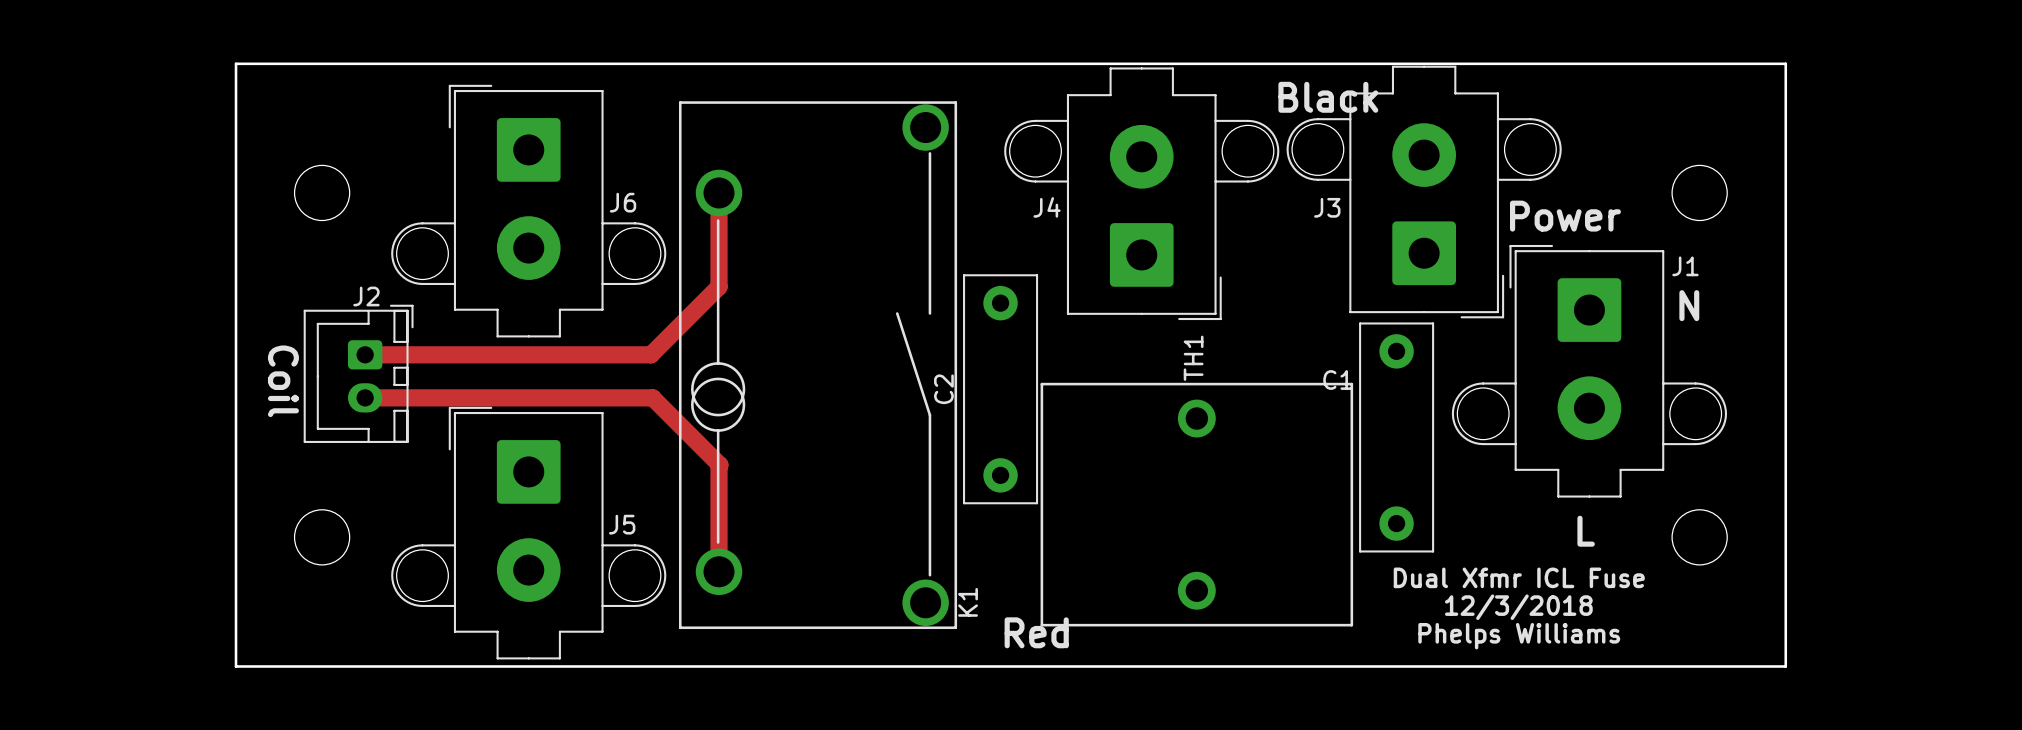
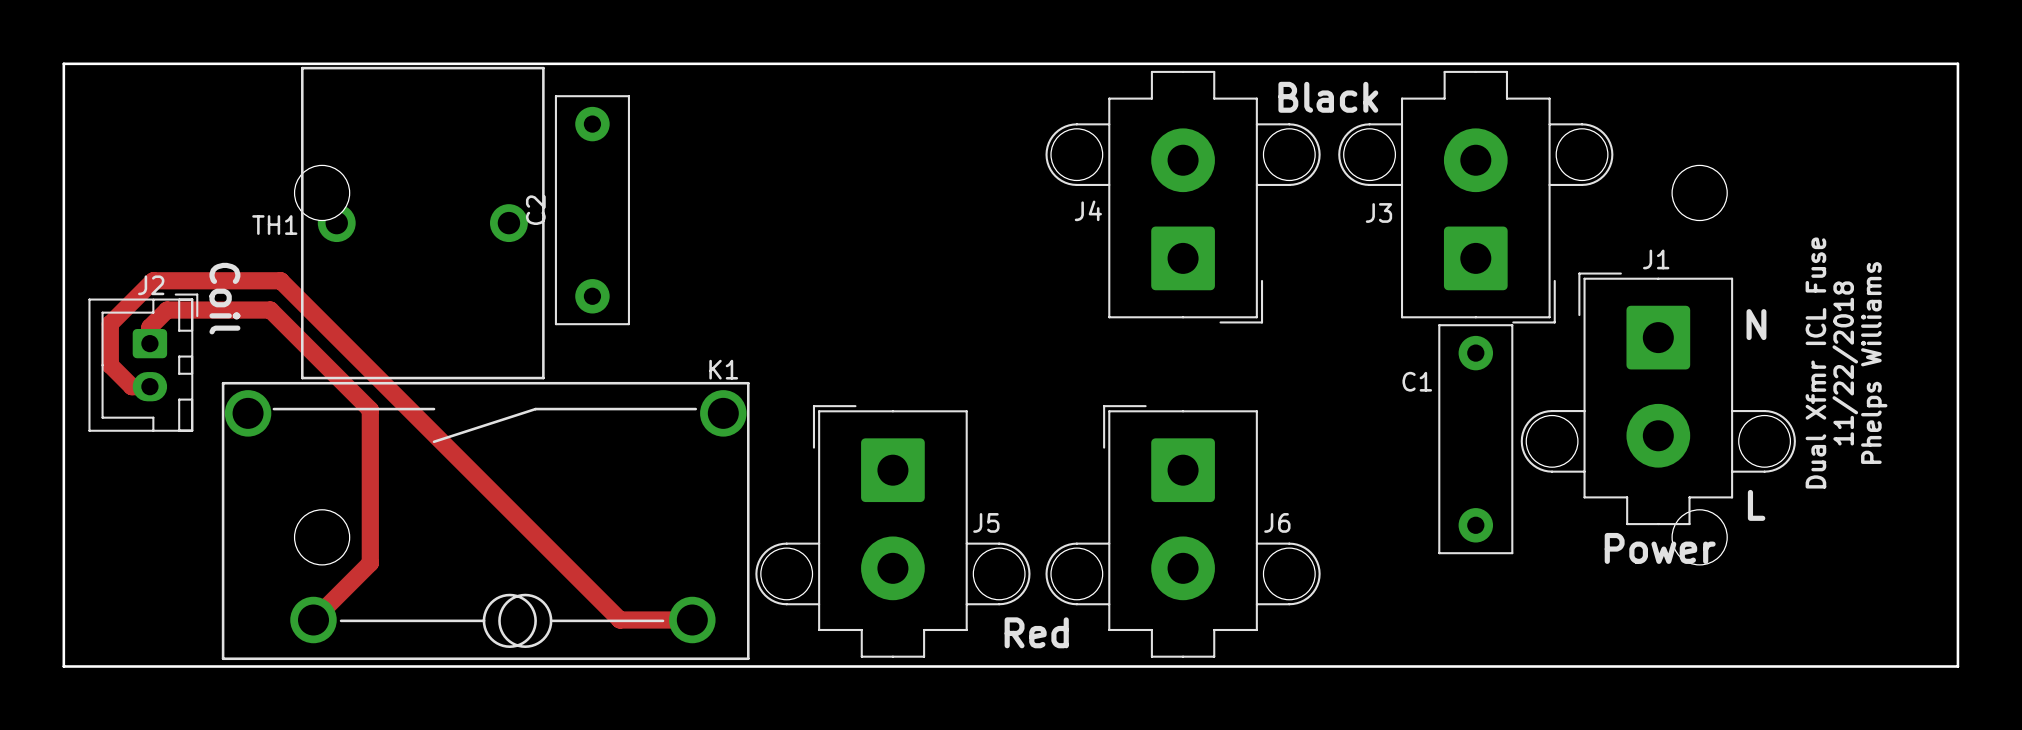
board edge: (236, 63) (236, 666) -> (236, 63) (63, 63) (63, 666) (236, 666)
board edge: (1785, 63) (1785, 666) -> (1785, 63) (1957, 63) (1957, 666) (1785, 666)
track: (719, 192) (719, 286) (650, 354) (365, 354) -> none
J3 position: (1424, 192) -> (1475, 197)
J4 position: (1141, 193) -> (1183, 197)
J6 position: (528, 211) -> (1183, 531)
text position: Power (1565, 216) -> Power (1660, 548)
J1 name position: J1 (1685, 266) -> J1 (1656, 259)
text position: N (1689, 305) -> N (1756, 324)
track: none -> (149, 343) (149, 327) (167, 310) (270, 310) (370, 409) (370, 563) (313, 620)
TH1 name position: TH1 (1193, 358) -> TH1 (274, 225)
text: none -> 11/22/2018 (1845, 363)
text: none -> Phelps Williams (1874, 363)
K1 rotation: 0° (818, 365) -> 90° counterclockwise (485, 520)
K1 position: (818, 365) -> (485, 520)
J1 position: (1589, 371) -> (1658, 398)
J2 position: (358, 373) -> (143, 362)
text position: Coil (283, 381) -> Coil (224, 298)
track: none -> (149, 386) (131, 386) (110, 365) (110, 323) (153, 280) (280, 280) (620, 620) (692, 620)
C2 position: (1000, 389) -> (592, 210)
track: (365, 397) (652, 397) (719, 465) (719, 571) -> none
C1 position: (1396, 437) -> (1475, 439)
TH1 rotation: 0° (1196, 504) -> 90° clockwise (422, 223)
TH1 position: (1196, 504) -> (422, 223)
text position: L (1586, 531) -> L (1756, 505)
J5 position: (528, 533) -> (892, 531)
text rotation: 0° (1519, 577) -> 90° counterclockwise (1815, 363)
text position: Dual Xfmr ICL Fuse (1519, 577) -> Dual Xfmr ICL Fuse (1815, 363)
text: 12/3/2018 (1518, 607) -> none
text: Phelps Williams (1519, 636) -> none

